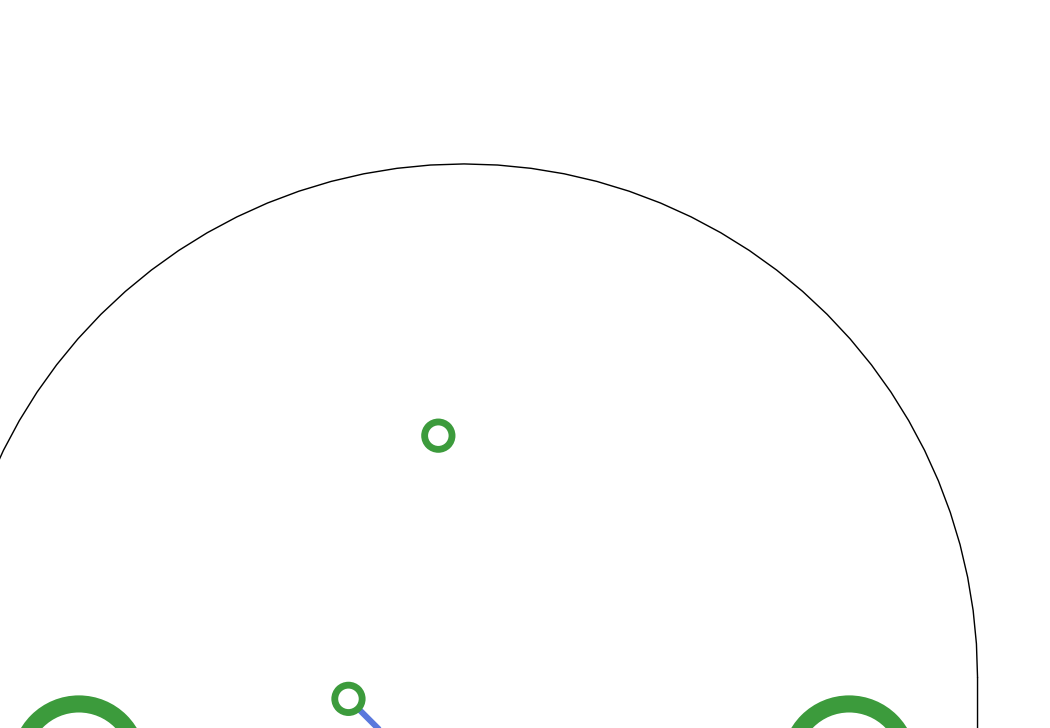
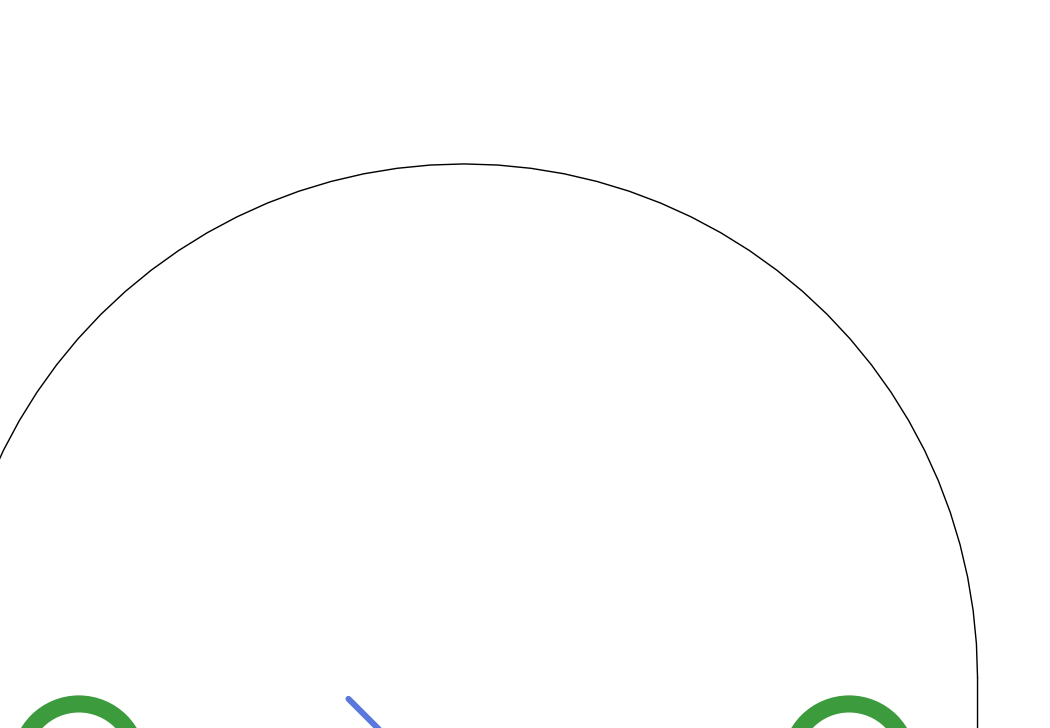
via: (438, 435) -> none
via: (348, 698) -> none

